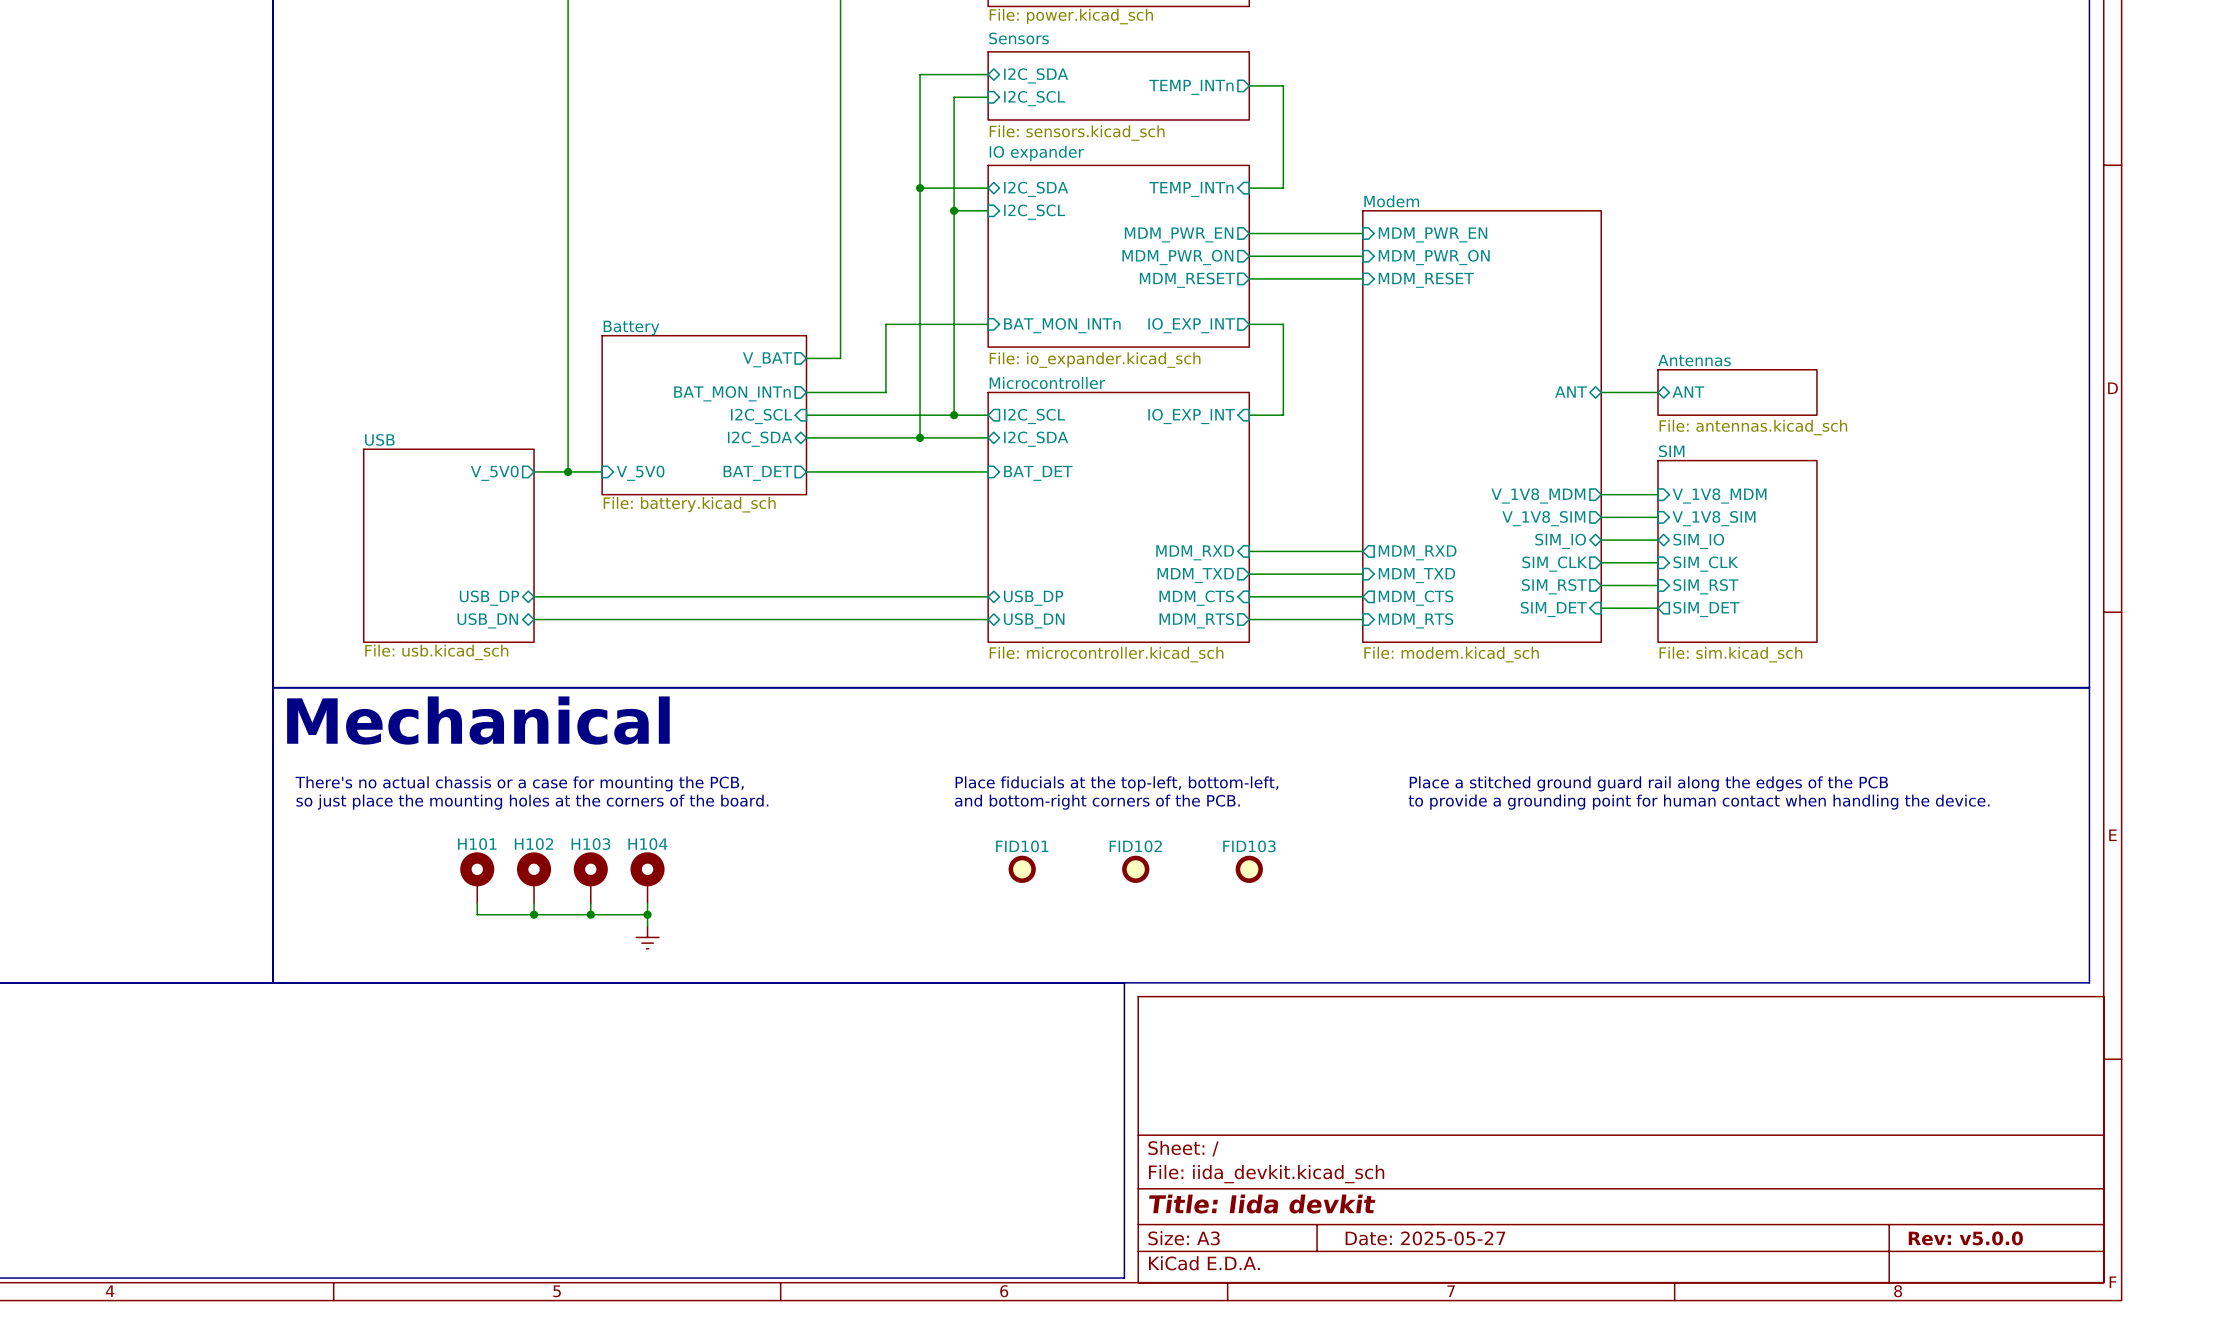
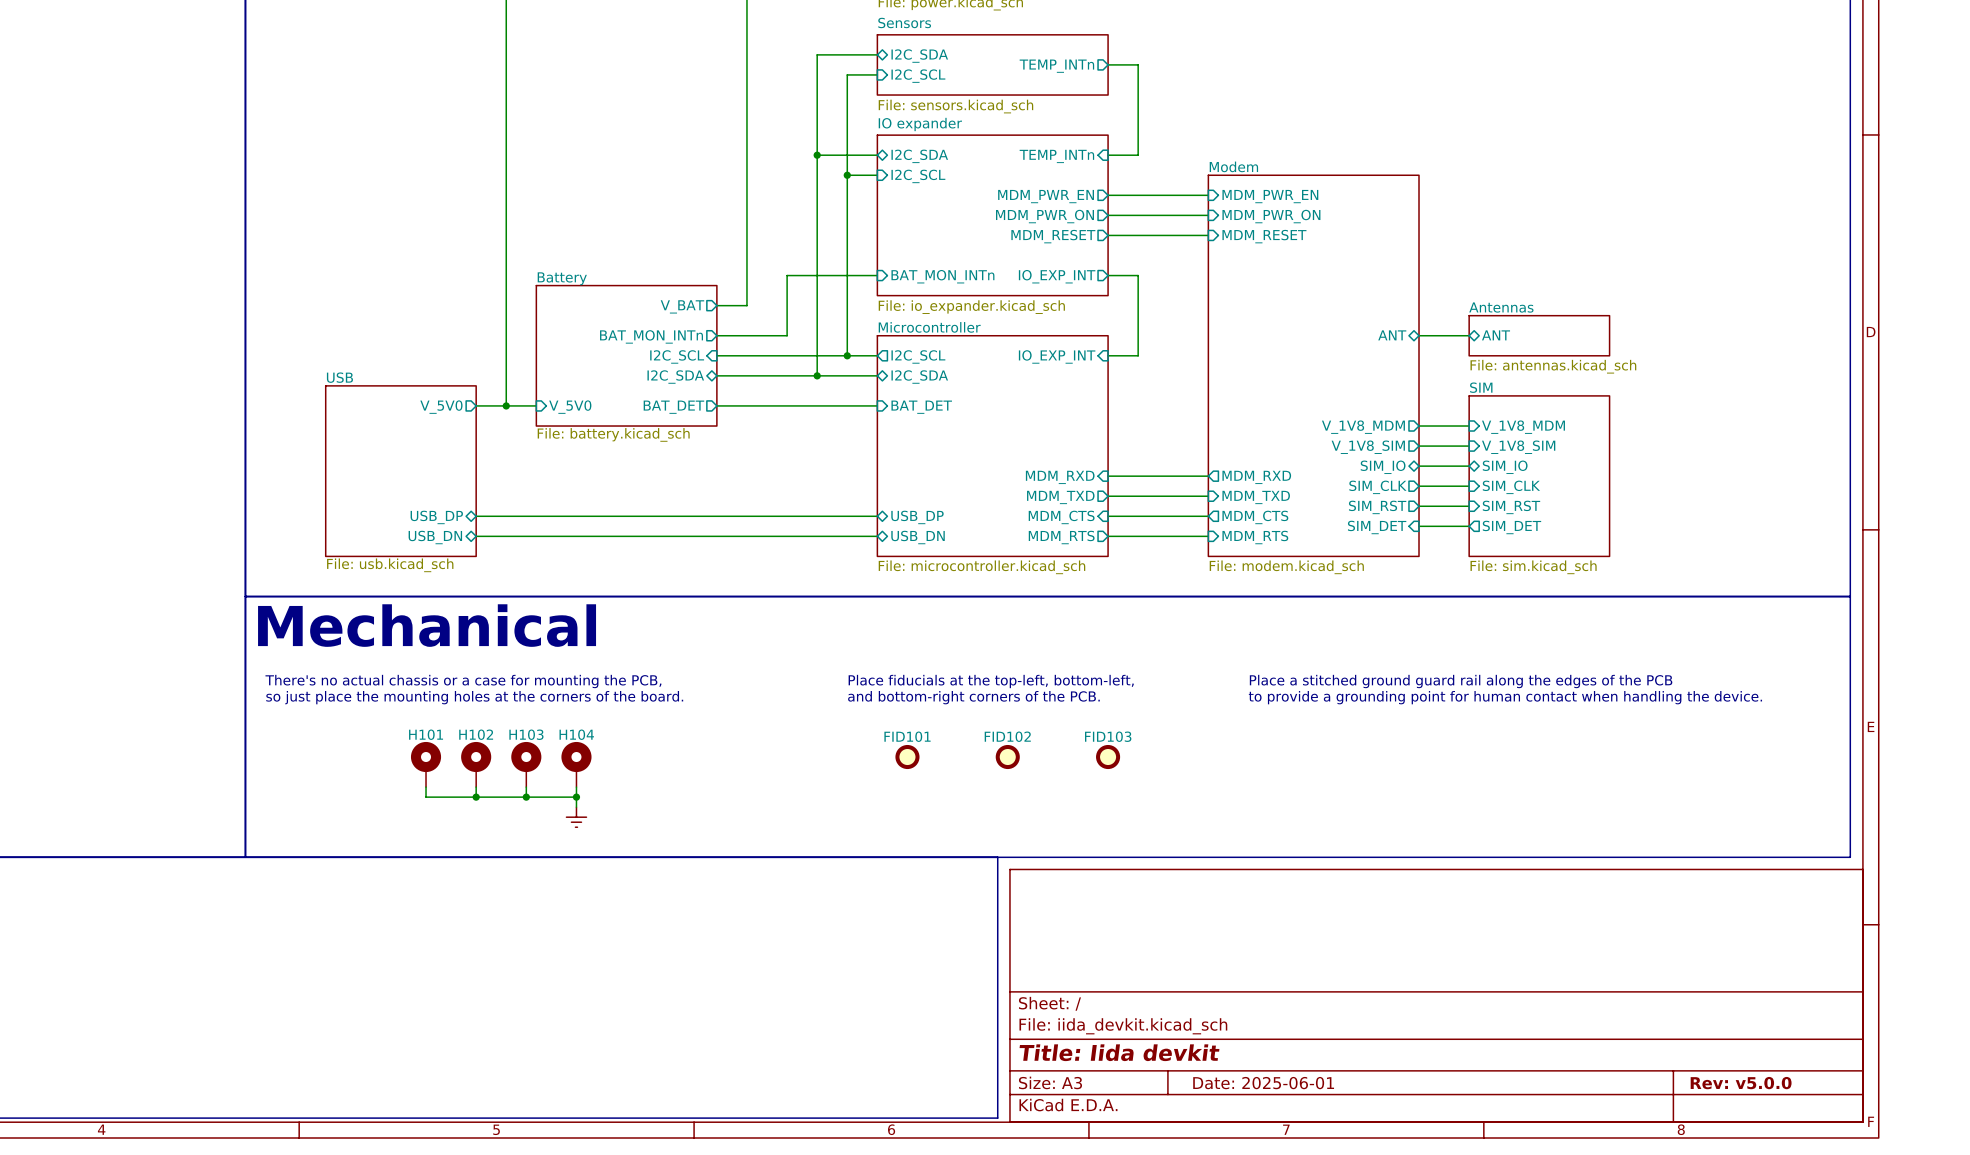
title block: Date: 2025-05-27 (1425, 1238) -> Date: 2025-06-01 (1263, 1083)

